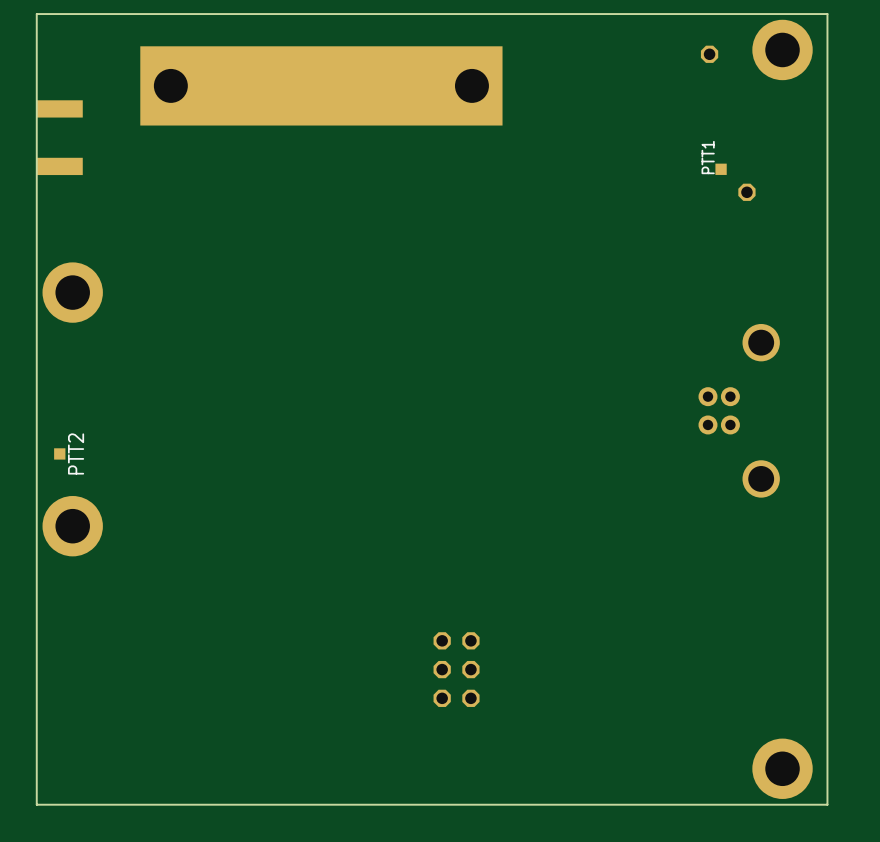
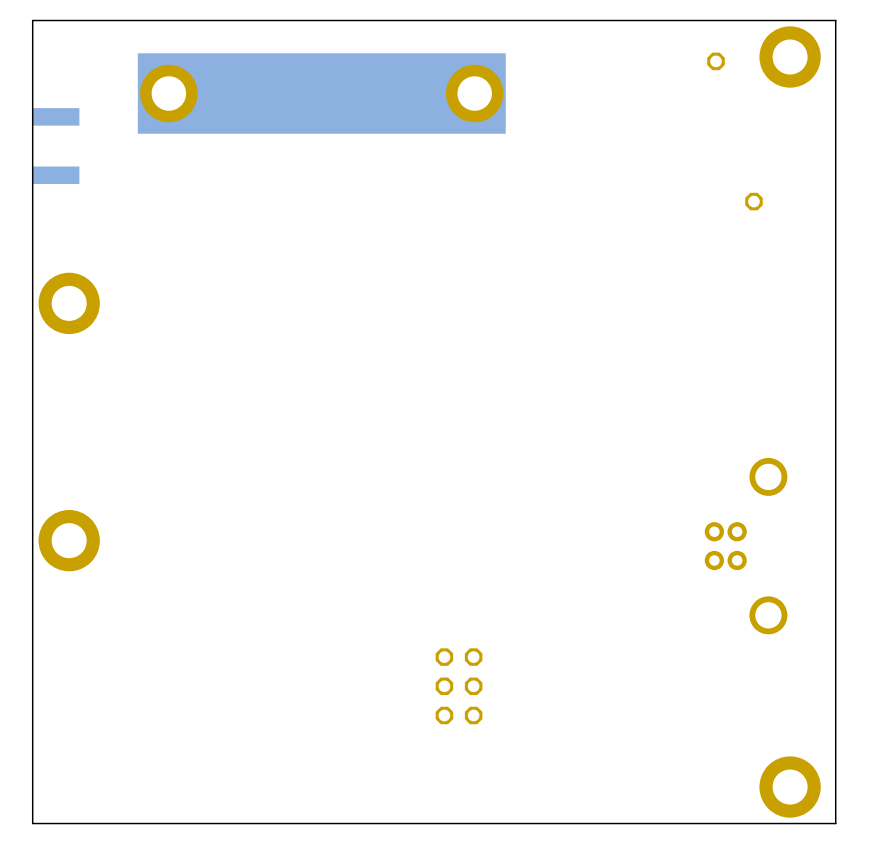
PTT1: (721, 169) -> none
part position: (739, 410) -> (746, 546)
PTT2: (59, 453) -> none

